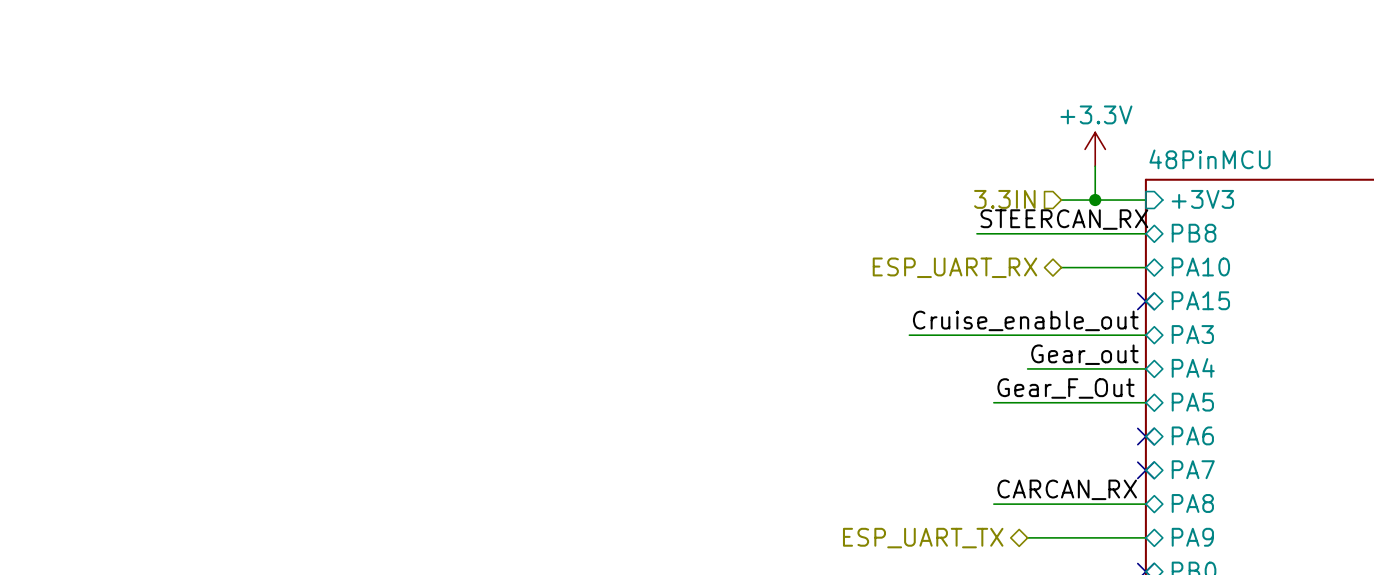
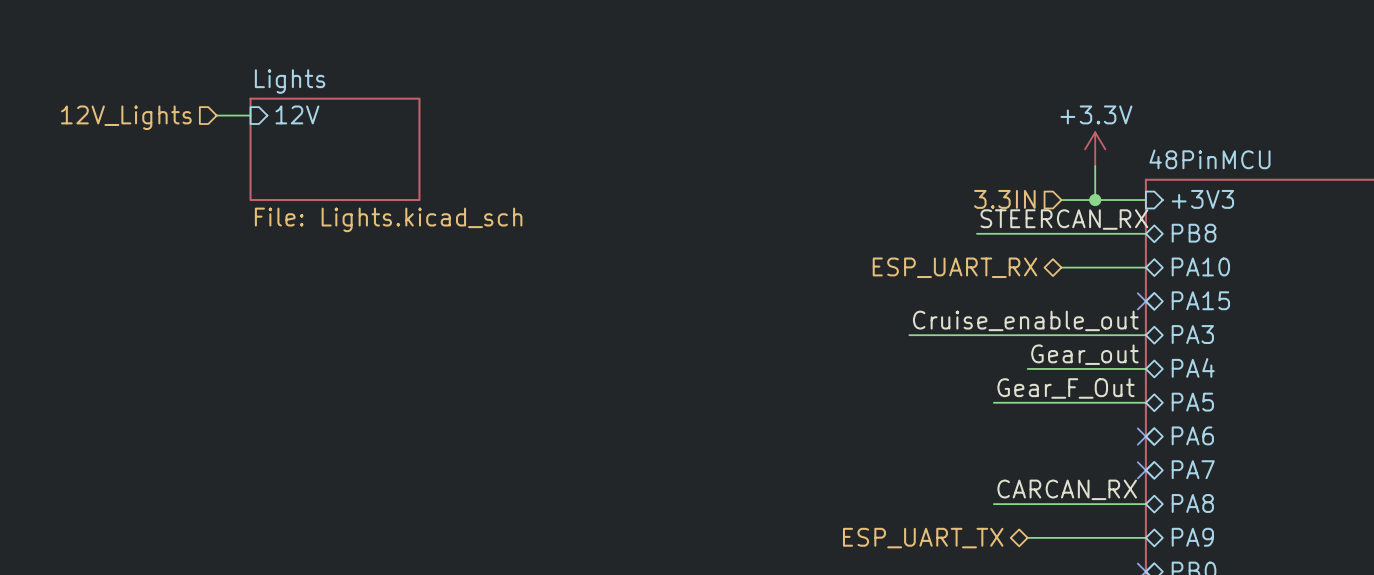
sheet pin: none -> 12V (297, 114)
wire: none -> (216, 115) (250, 115)
hierarchical label: none -> 12V_Lights (126, 117)
sheet Lights: none -> File: Lights.kicad_sch (335, 149)

